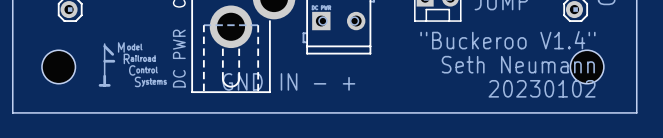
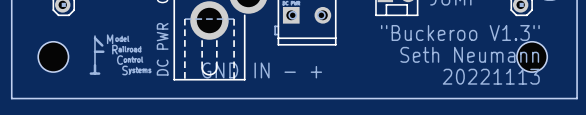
text: "Buckeroo V1.4" (507, 40) -> "Buckeroo V1.3" (460, 32)
text: 20230102 (542, 88) -> 20221113 (491, 76)

